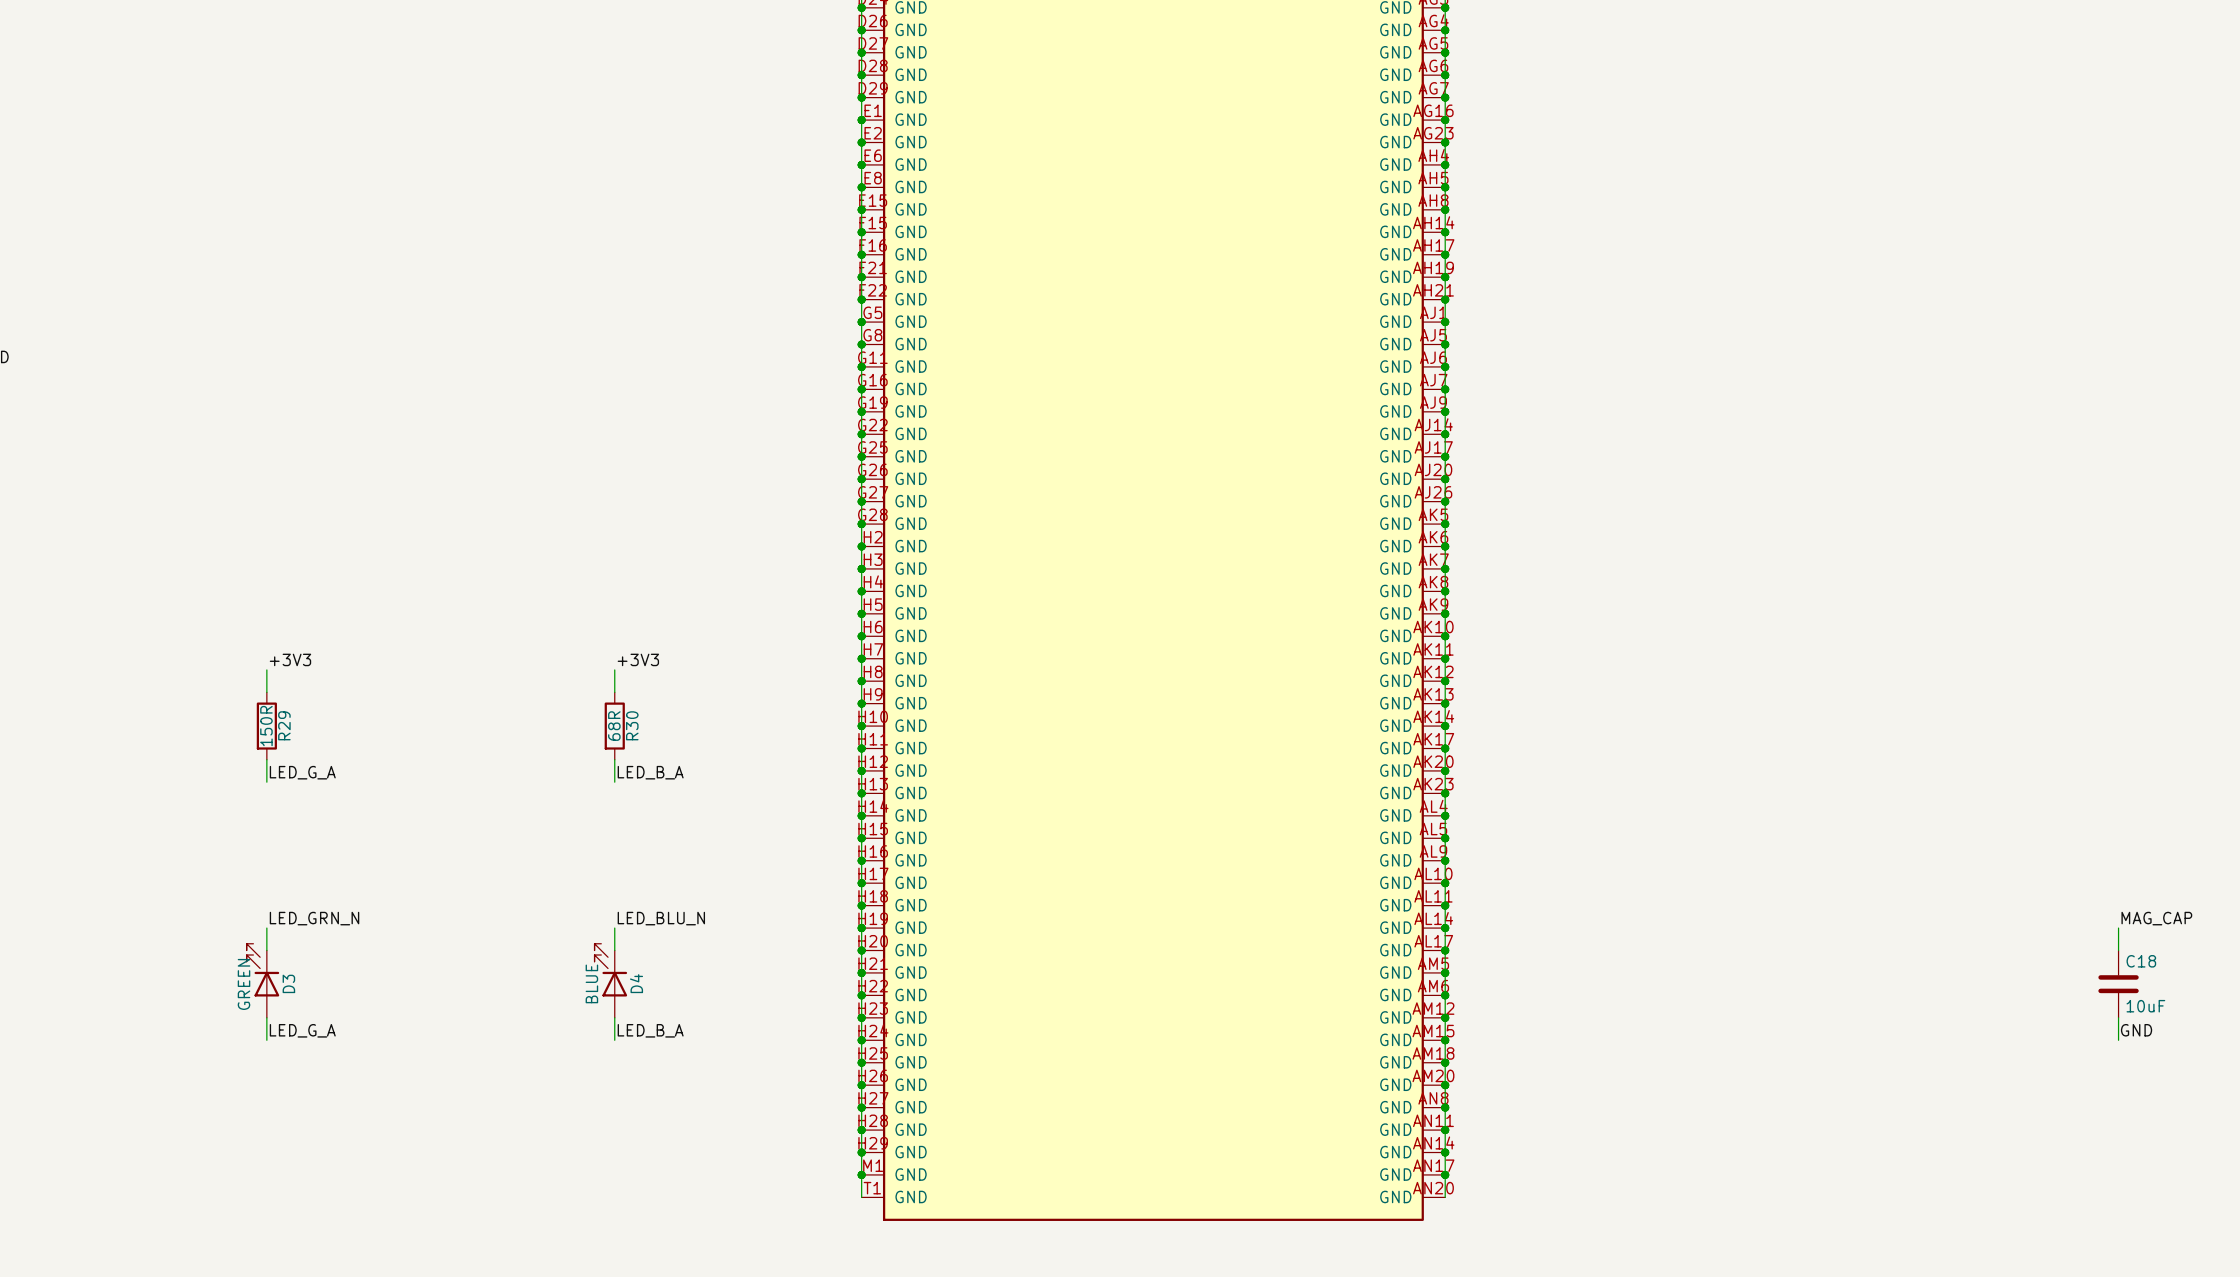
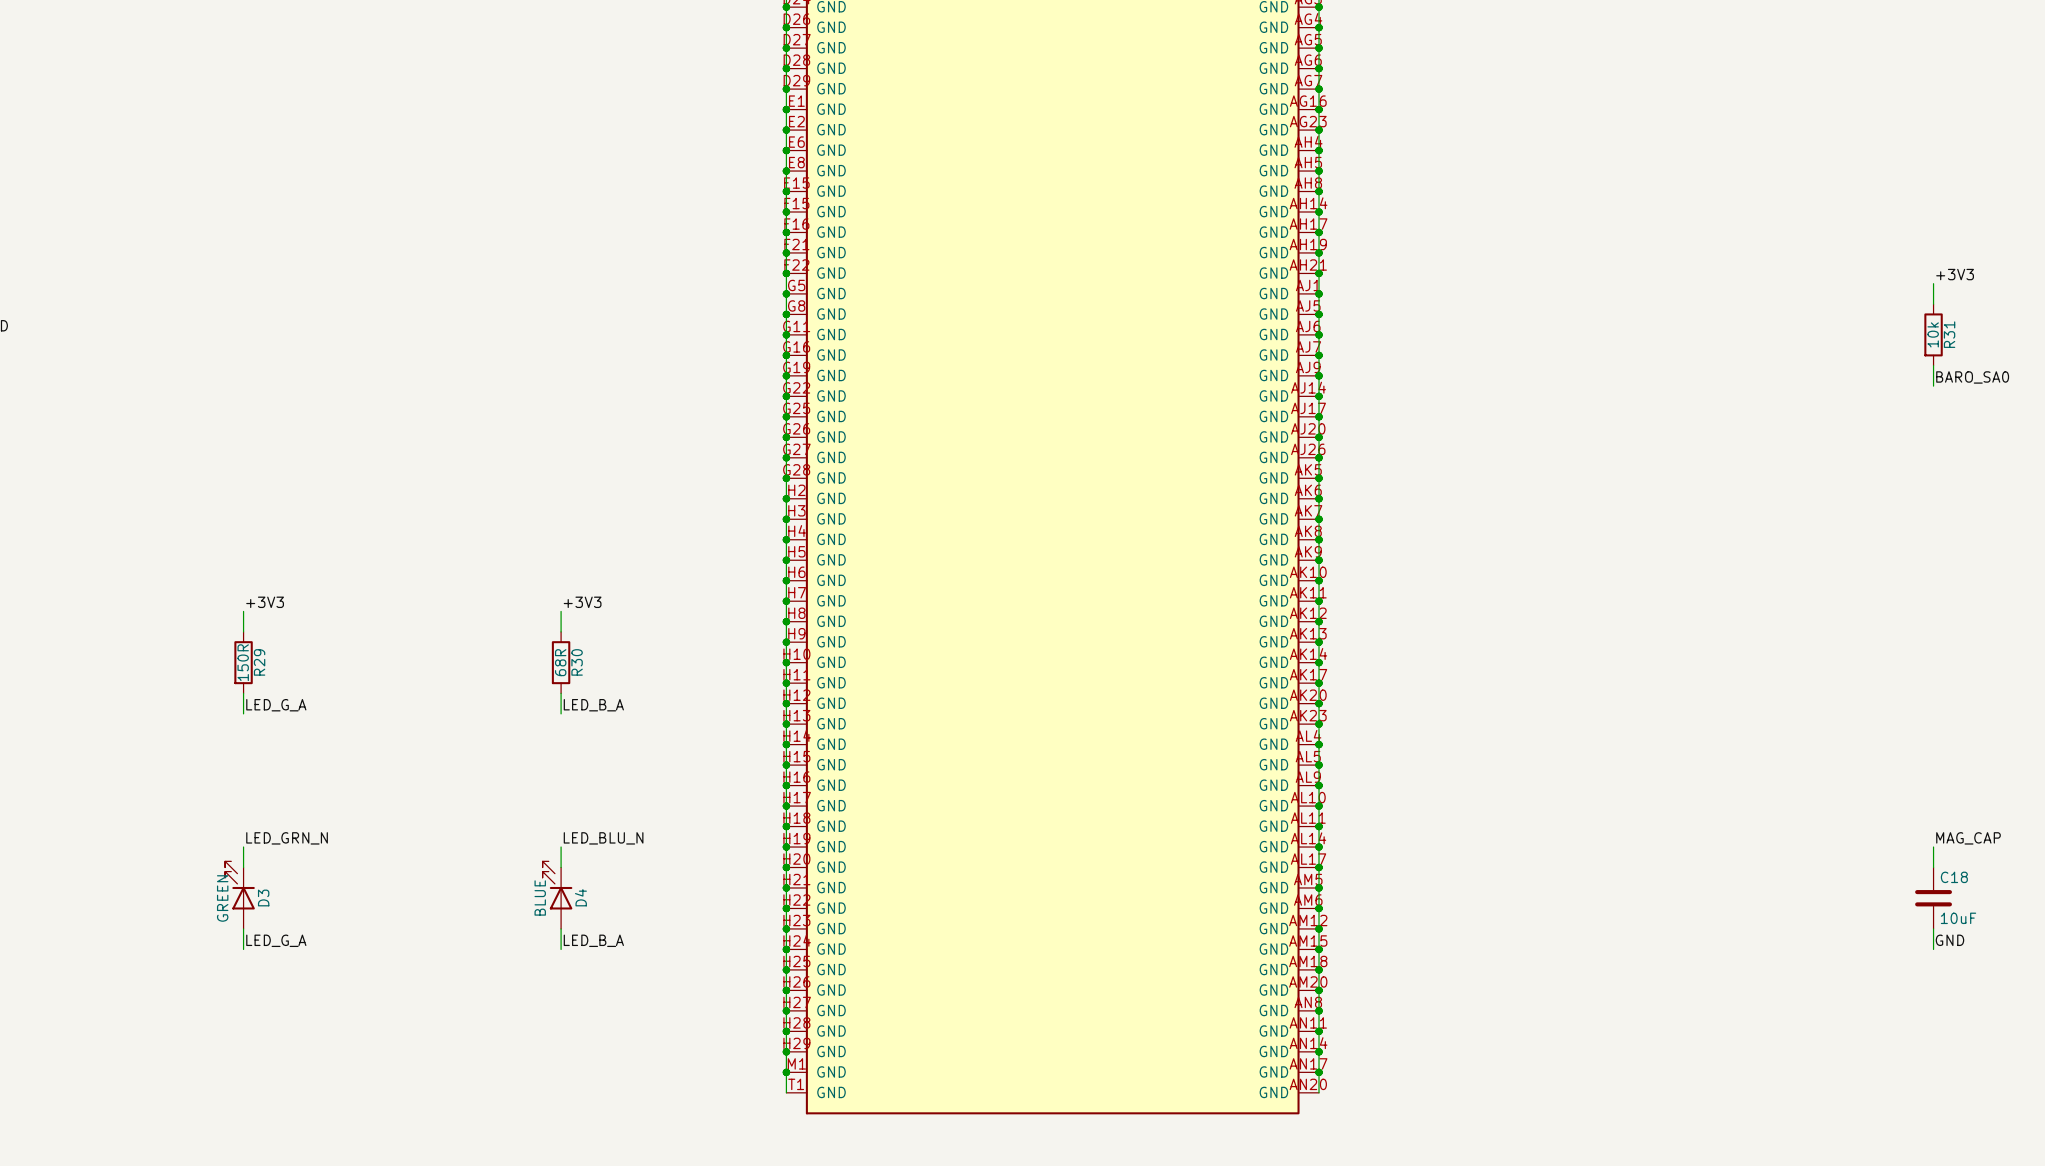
label: none -> +3V3 (1955, 274)
wire: none -> (1933, 283) (1933, 304)
R31: none -> 10k (1933, 334)
wire: none -> (1933, 365) (1933, 386)
label: none -> BARO_SA0 (1972, 377)

